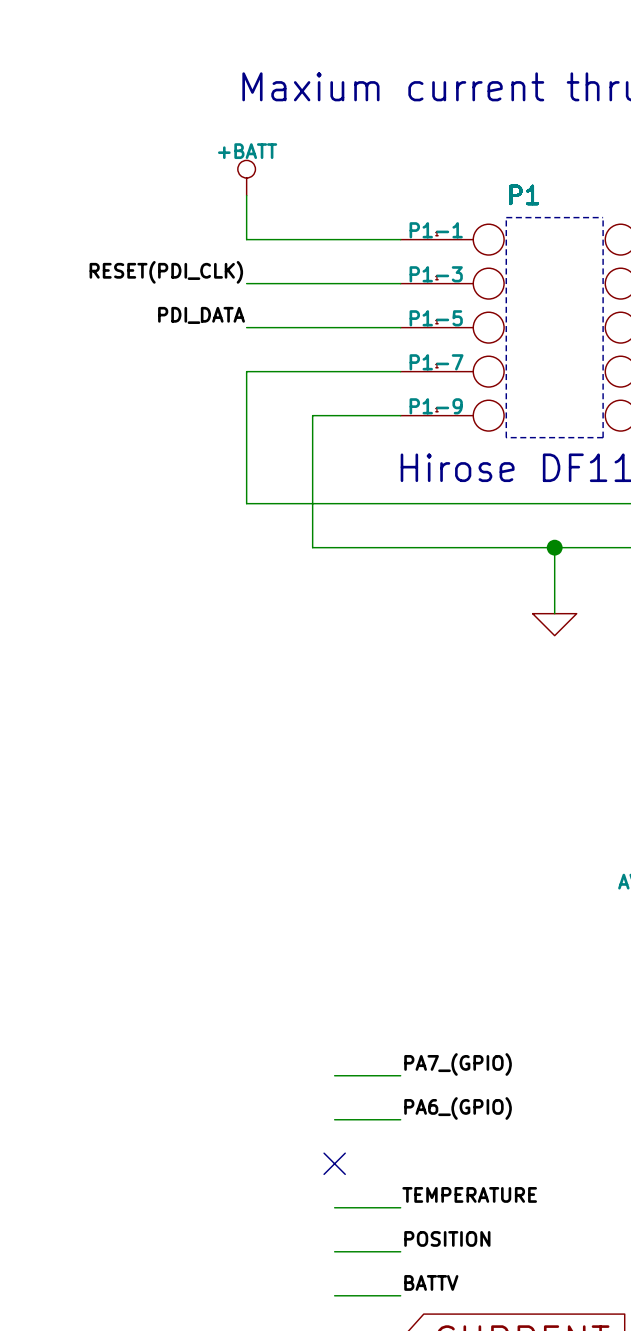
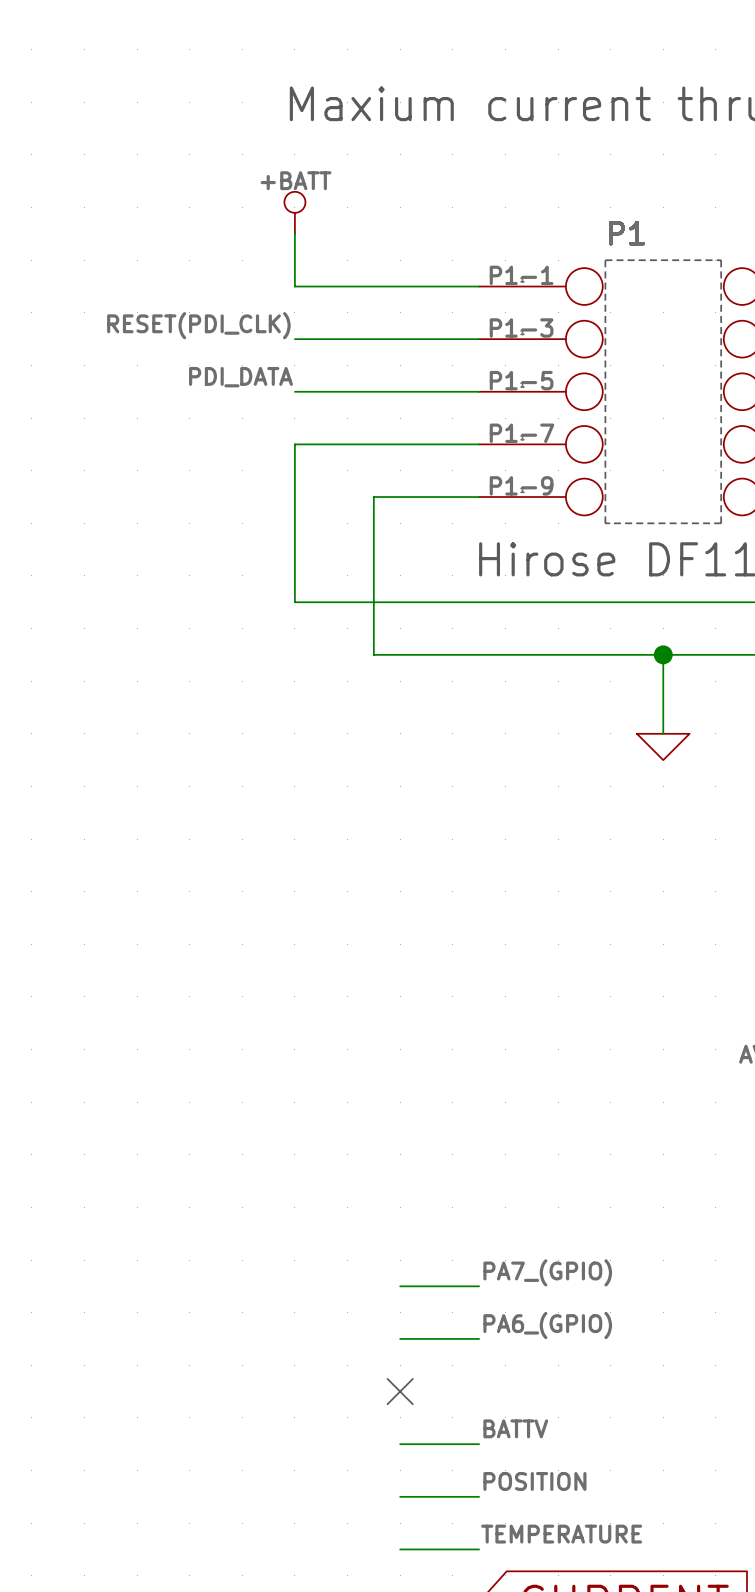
label: TEMPERATURE (469, 1194) -> BATTV (515, 1428)
label: BATTV (431, 1282) -> TEMPERATURE (561, 1534)

